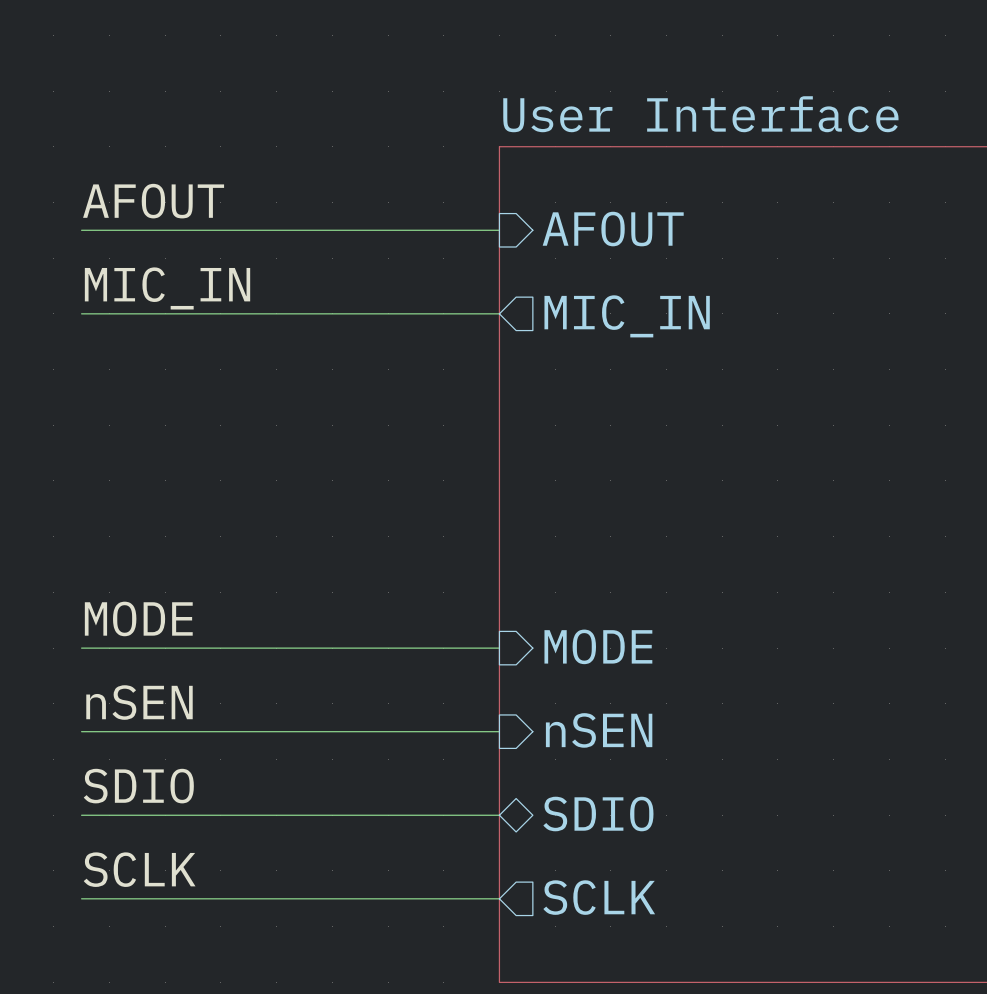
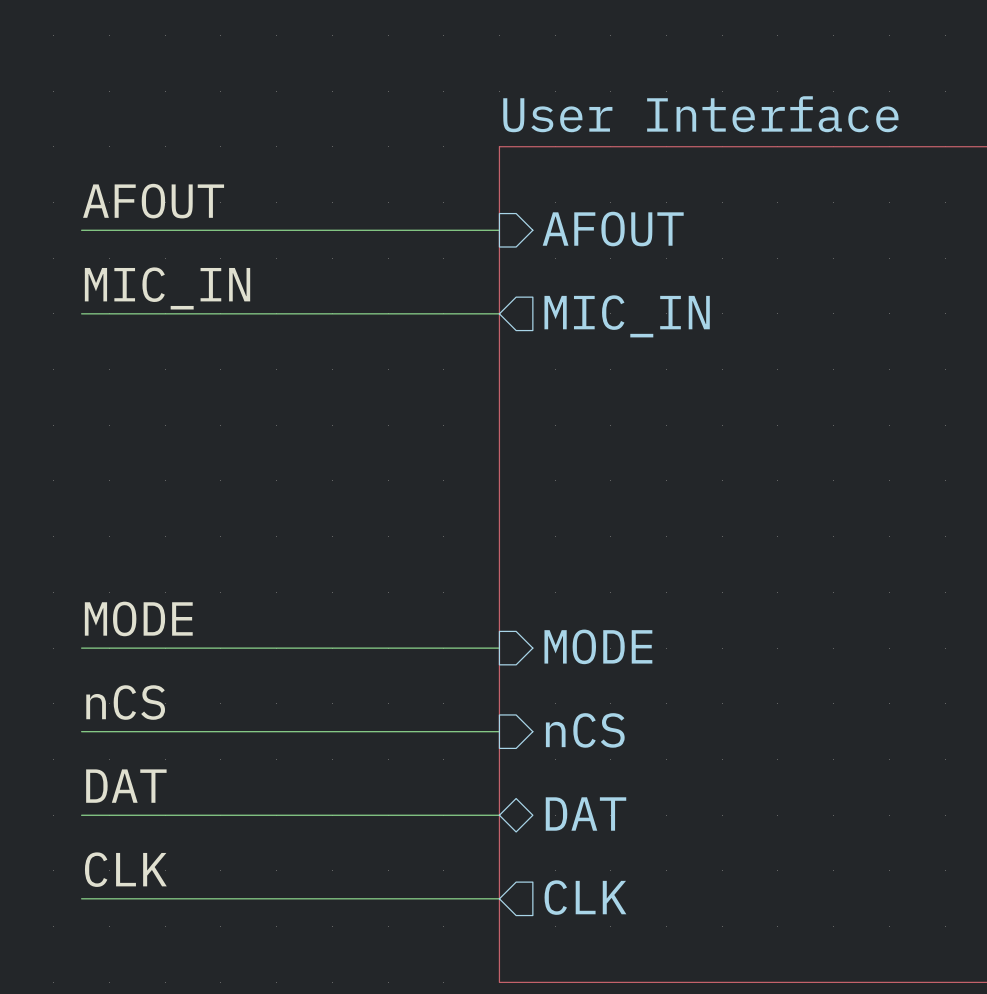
label: nSEN (139, 702) -> nCS (125, 702)
sheet pin: nSEN (599, 730) -> nCS (585, 730)
label: SDIO (138, 786) -> DAT (126, 786)
sheet pin: SDIO (598, 814) -> DAT (585, 814)
label: SCLK (139, 869) -> CLK (125, 869)
sheet pin: SCLK (599, 897) -> CLK (585, 897)

